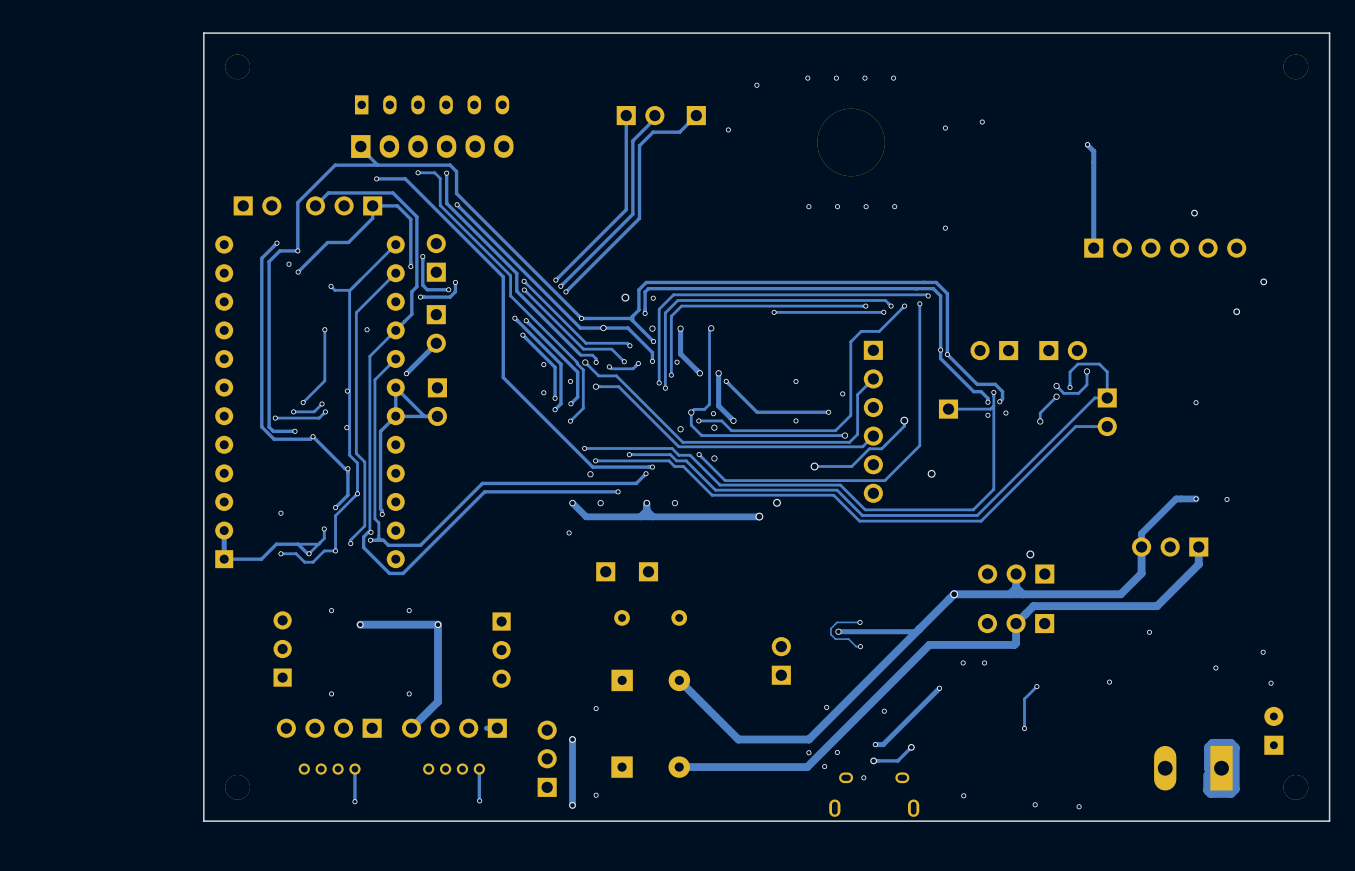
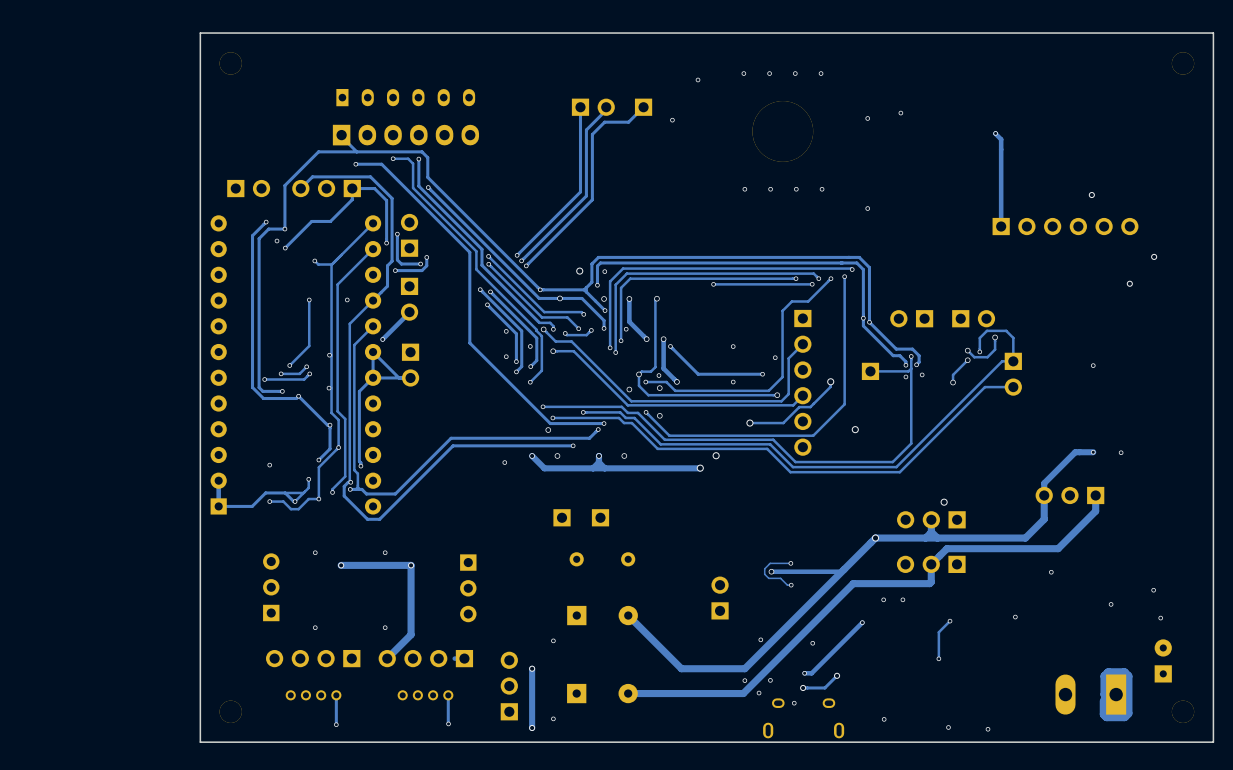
via position: (569, 532) -> (504, 462)

